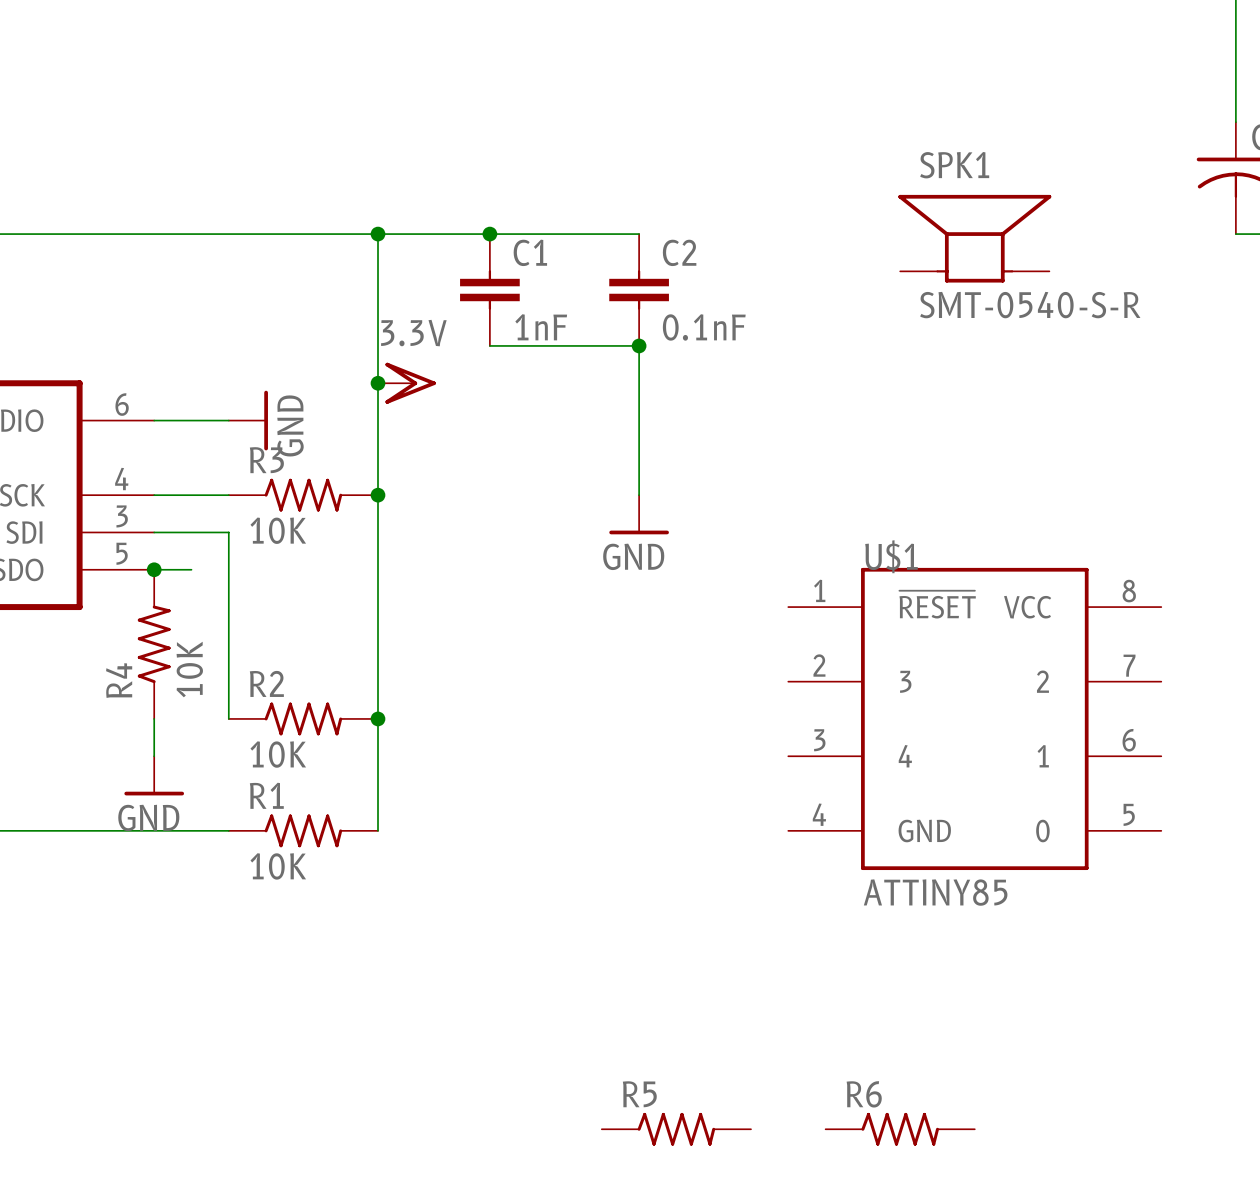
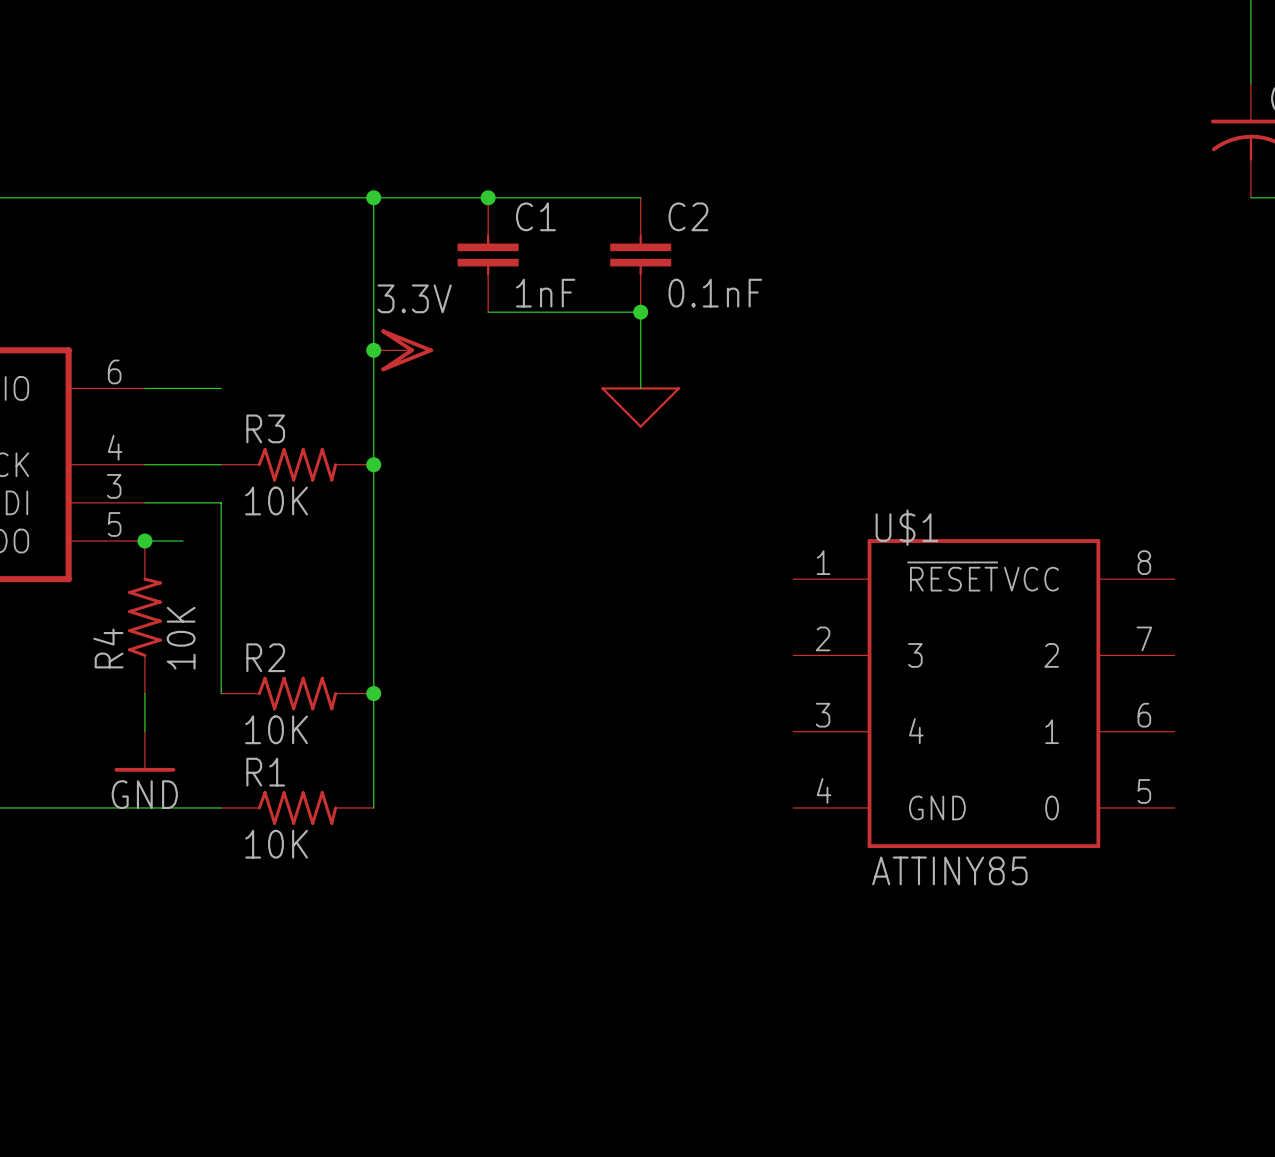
SPK1: SMT-0540-S-R (974, 238) -> none
power symbol: GND (248, 420) -> none
wire: (639, 420) (639, 495) -> none
power symbol: none -> (640, 407)
power symbol: GND (639, 514) -> none
R5: (676, 1129) -> none
R6: (900, 1129) -> none

